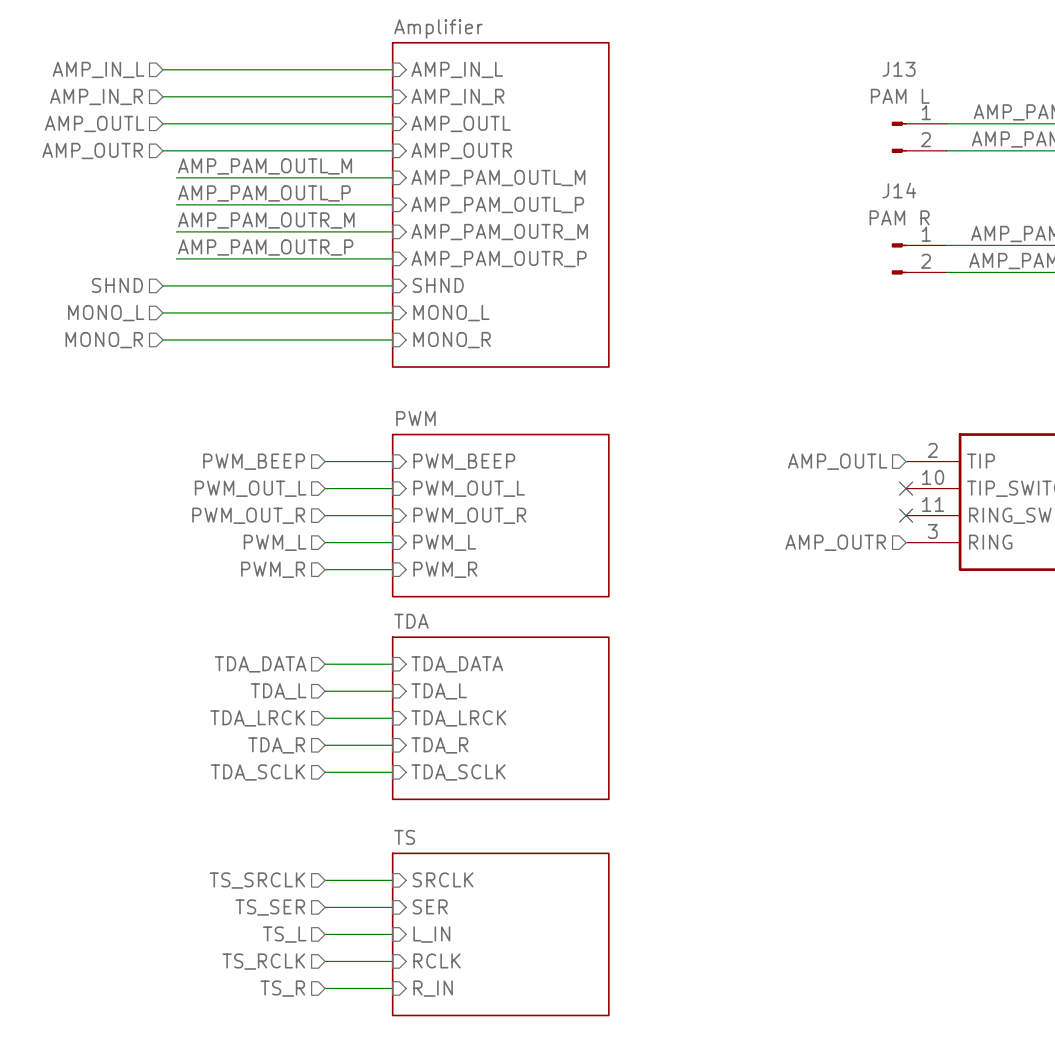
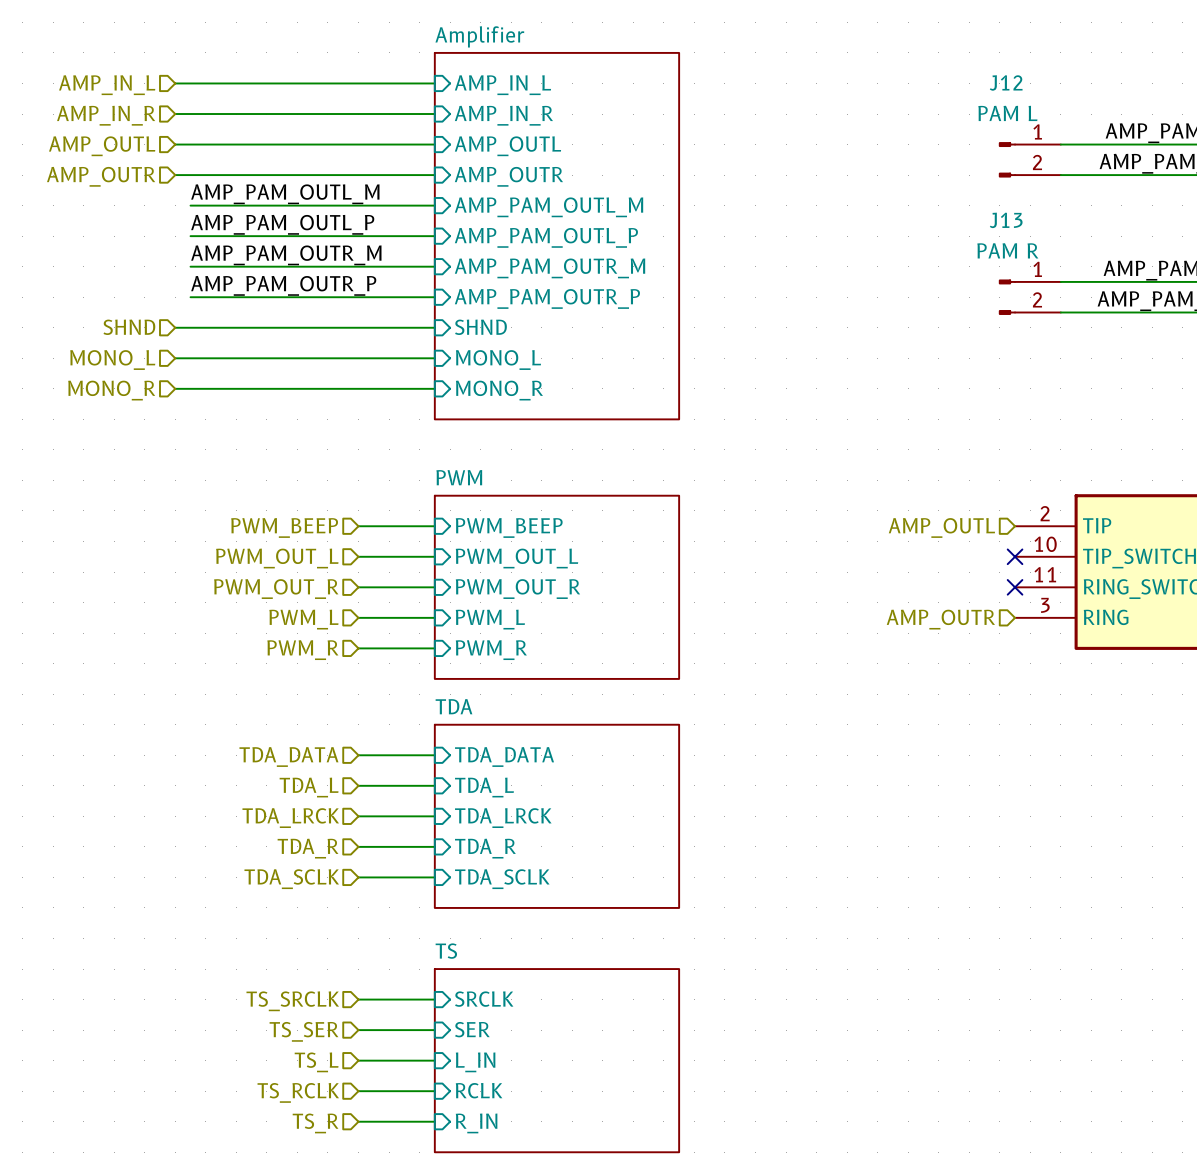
J13 name: J13 (898, 69) -> J12 (1006, 82)
J14 name: J14 (899, 190) -> J13 (1006, 220)

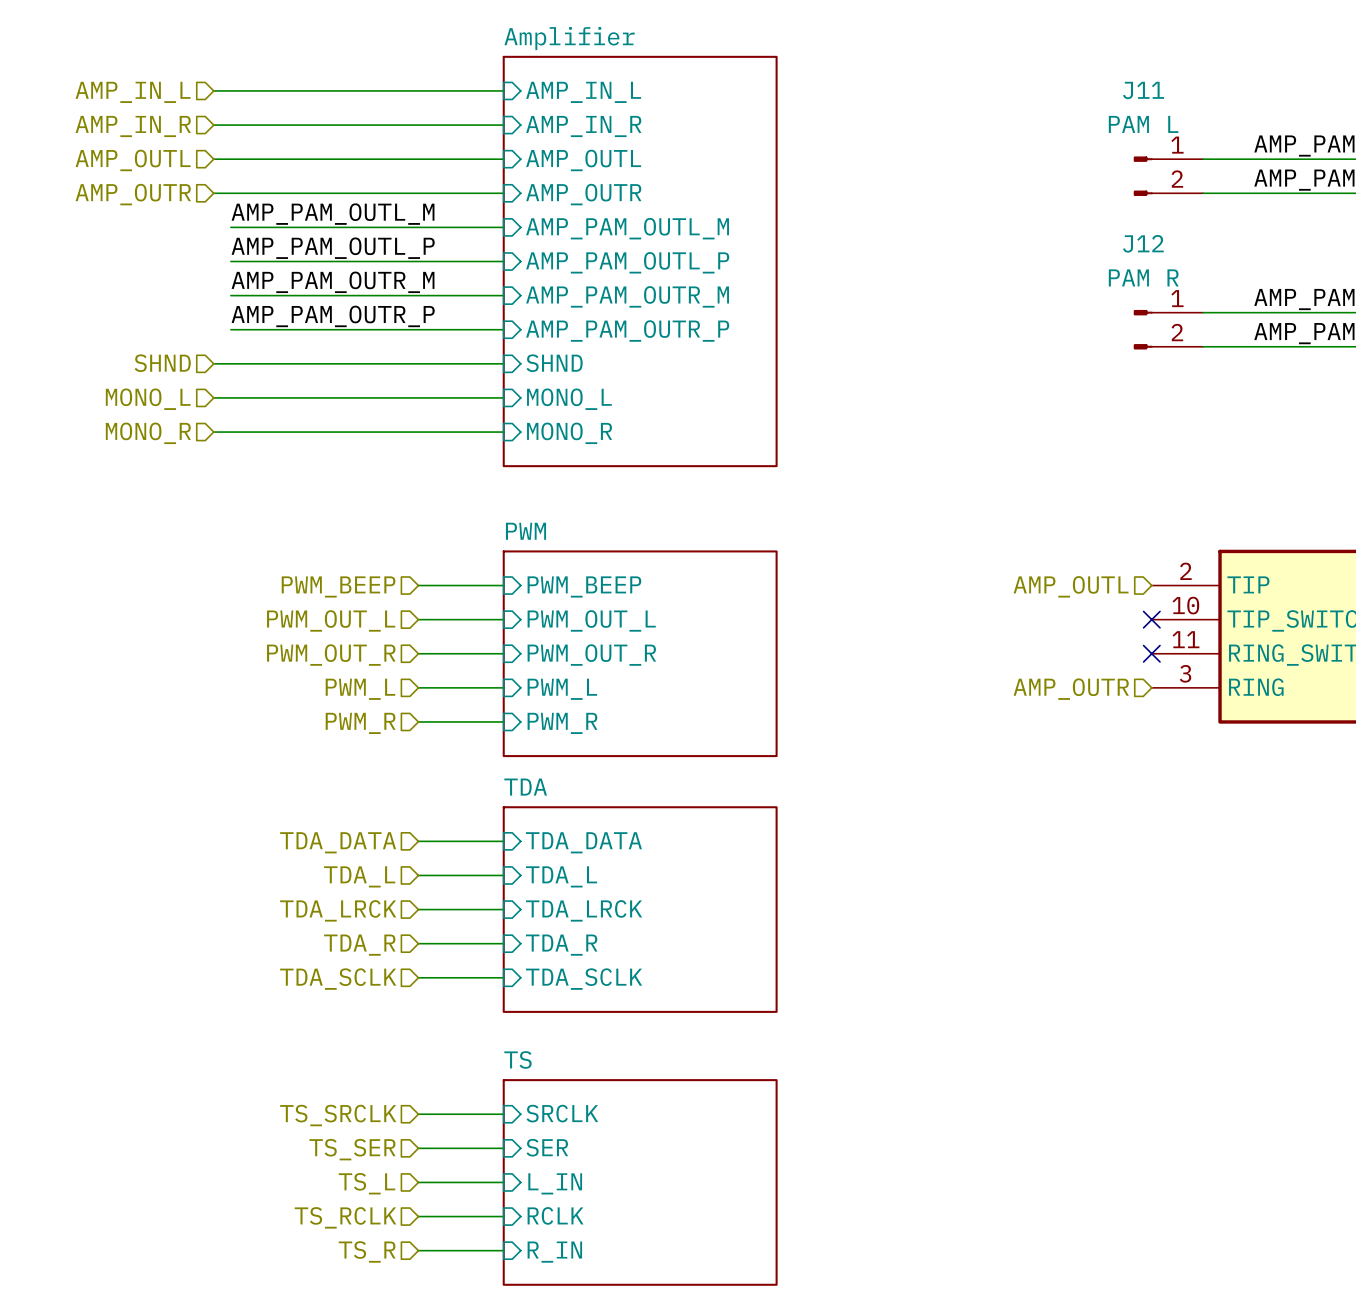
J12 name: J12 (1006, 82) -> J11 (1143, 90)
J13 name: J13 (1006, 220) -> J12 (1143, 243)

